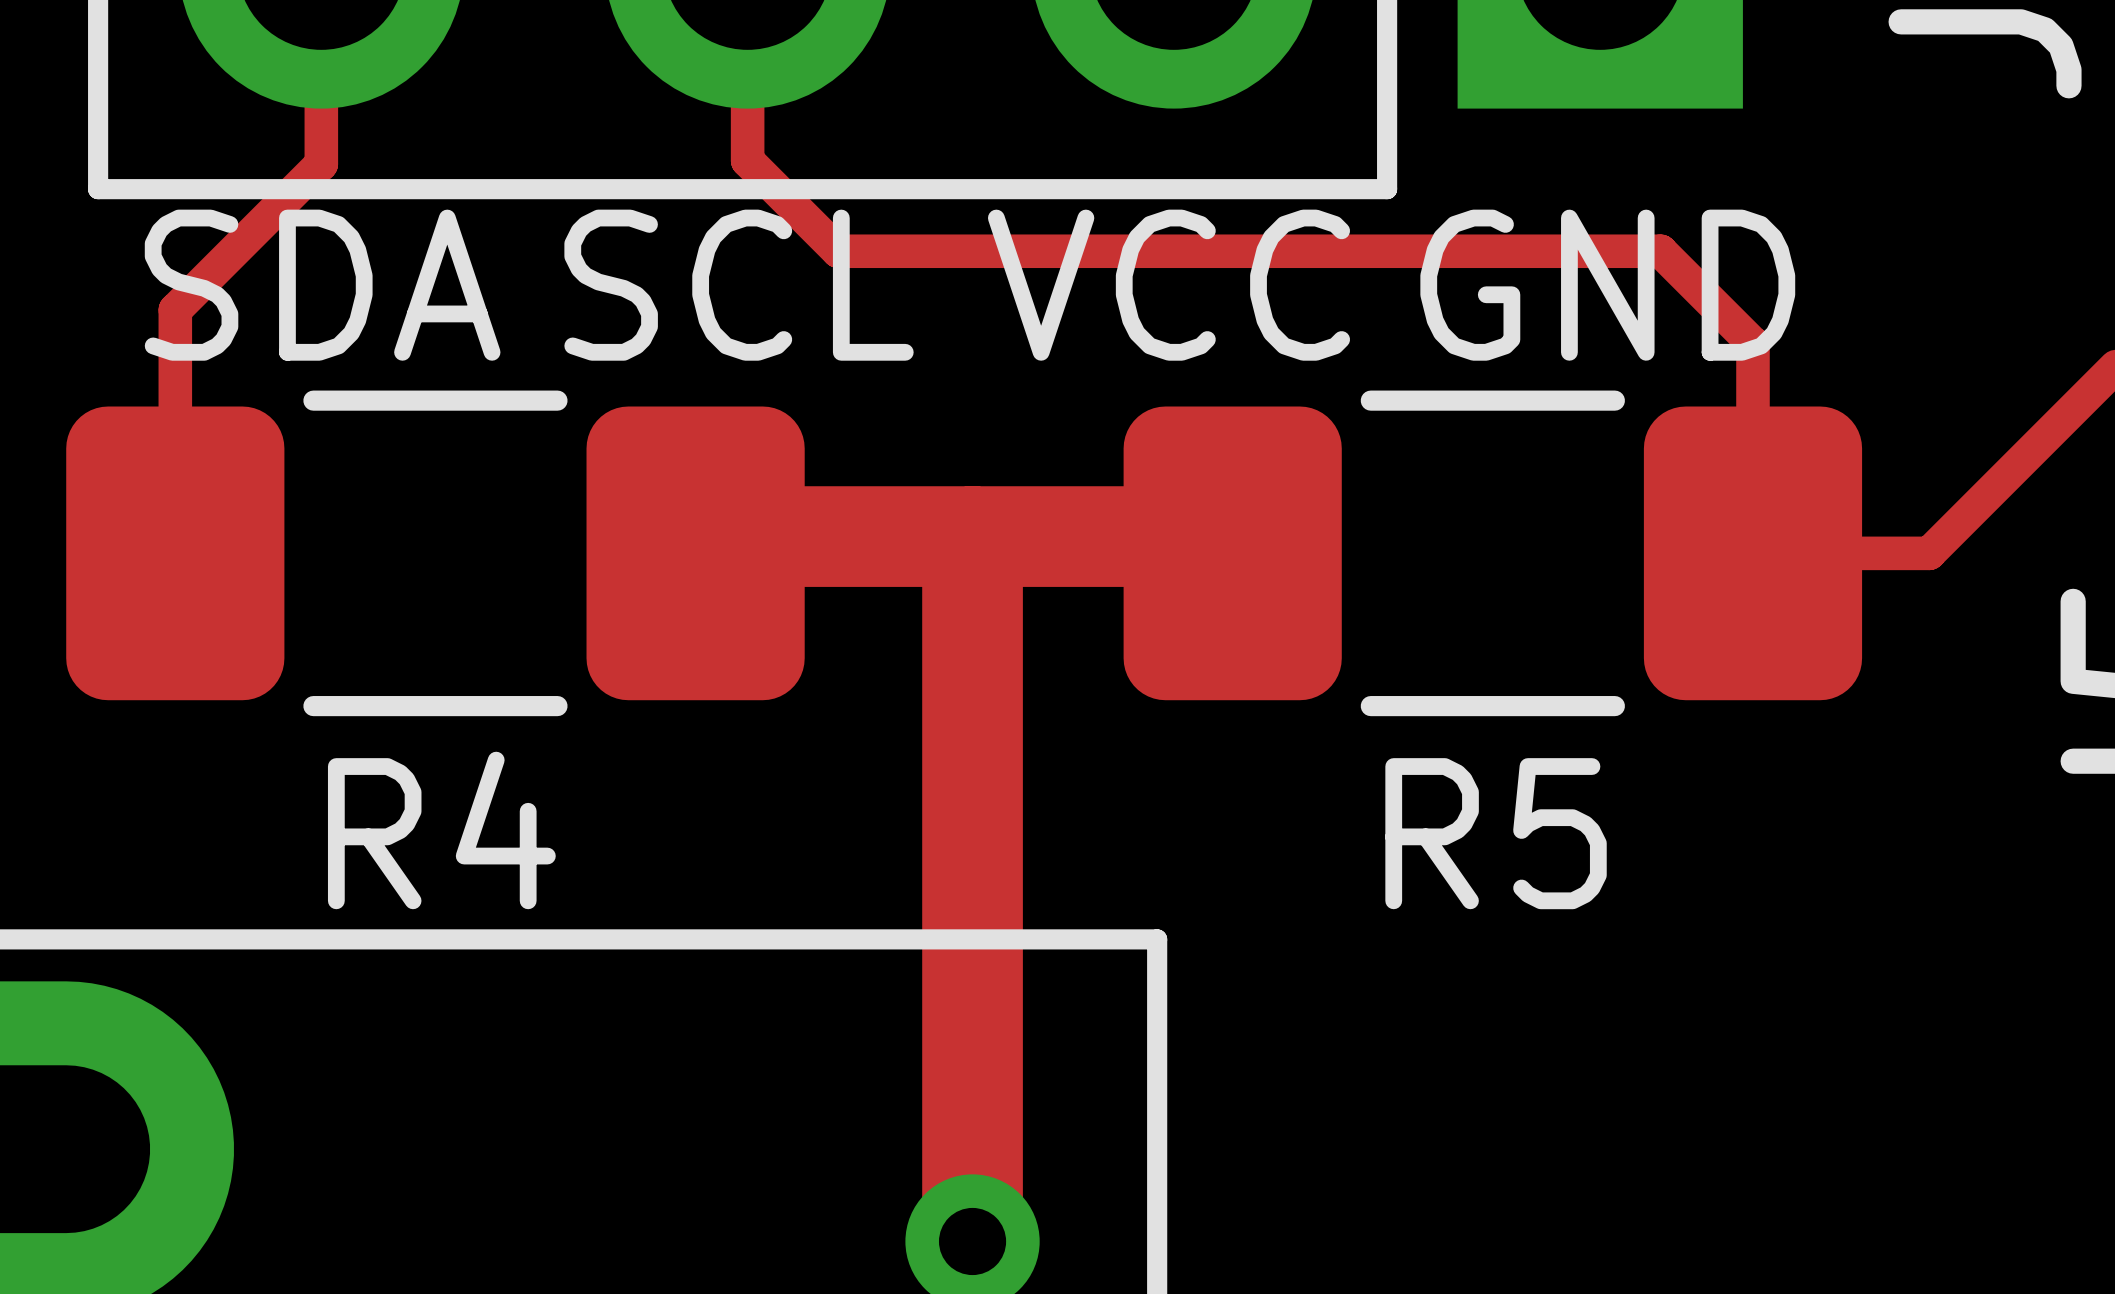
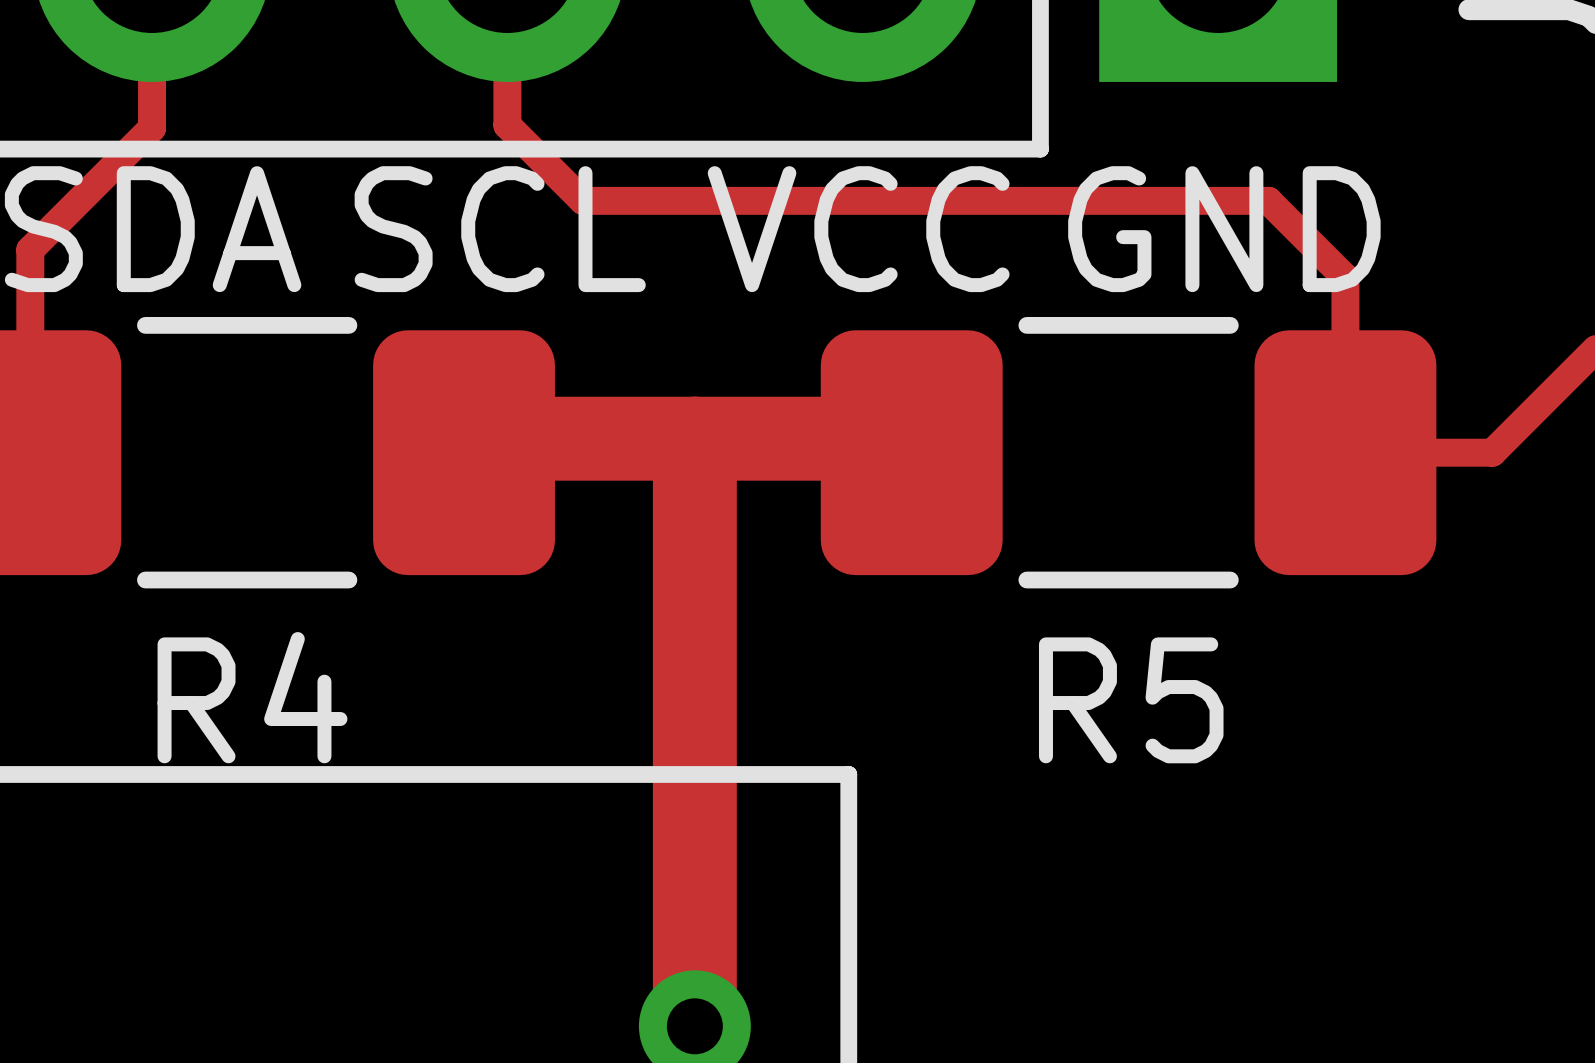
R4 name position: R4 (441, 830) -> R4 (252, 697)
R5 name position: R5 (1496, 833) -> R5 (1131, 700)

